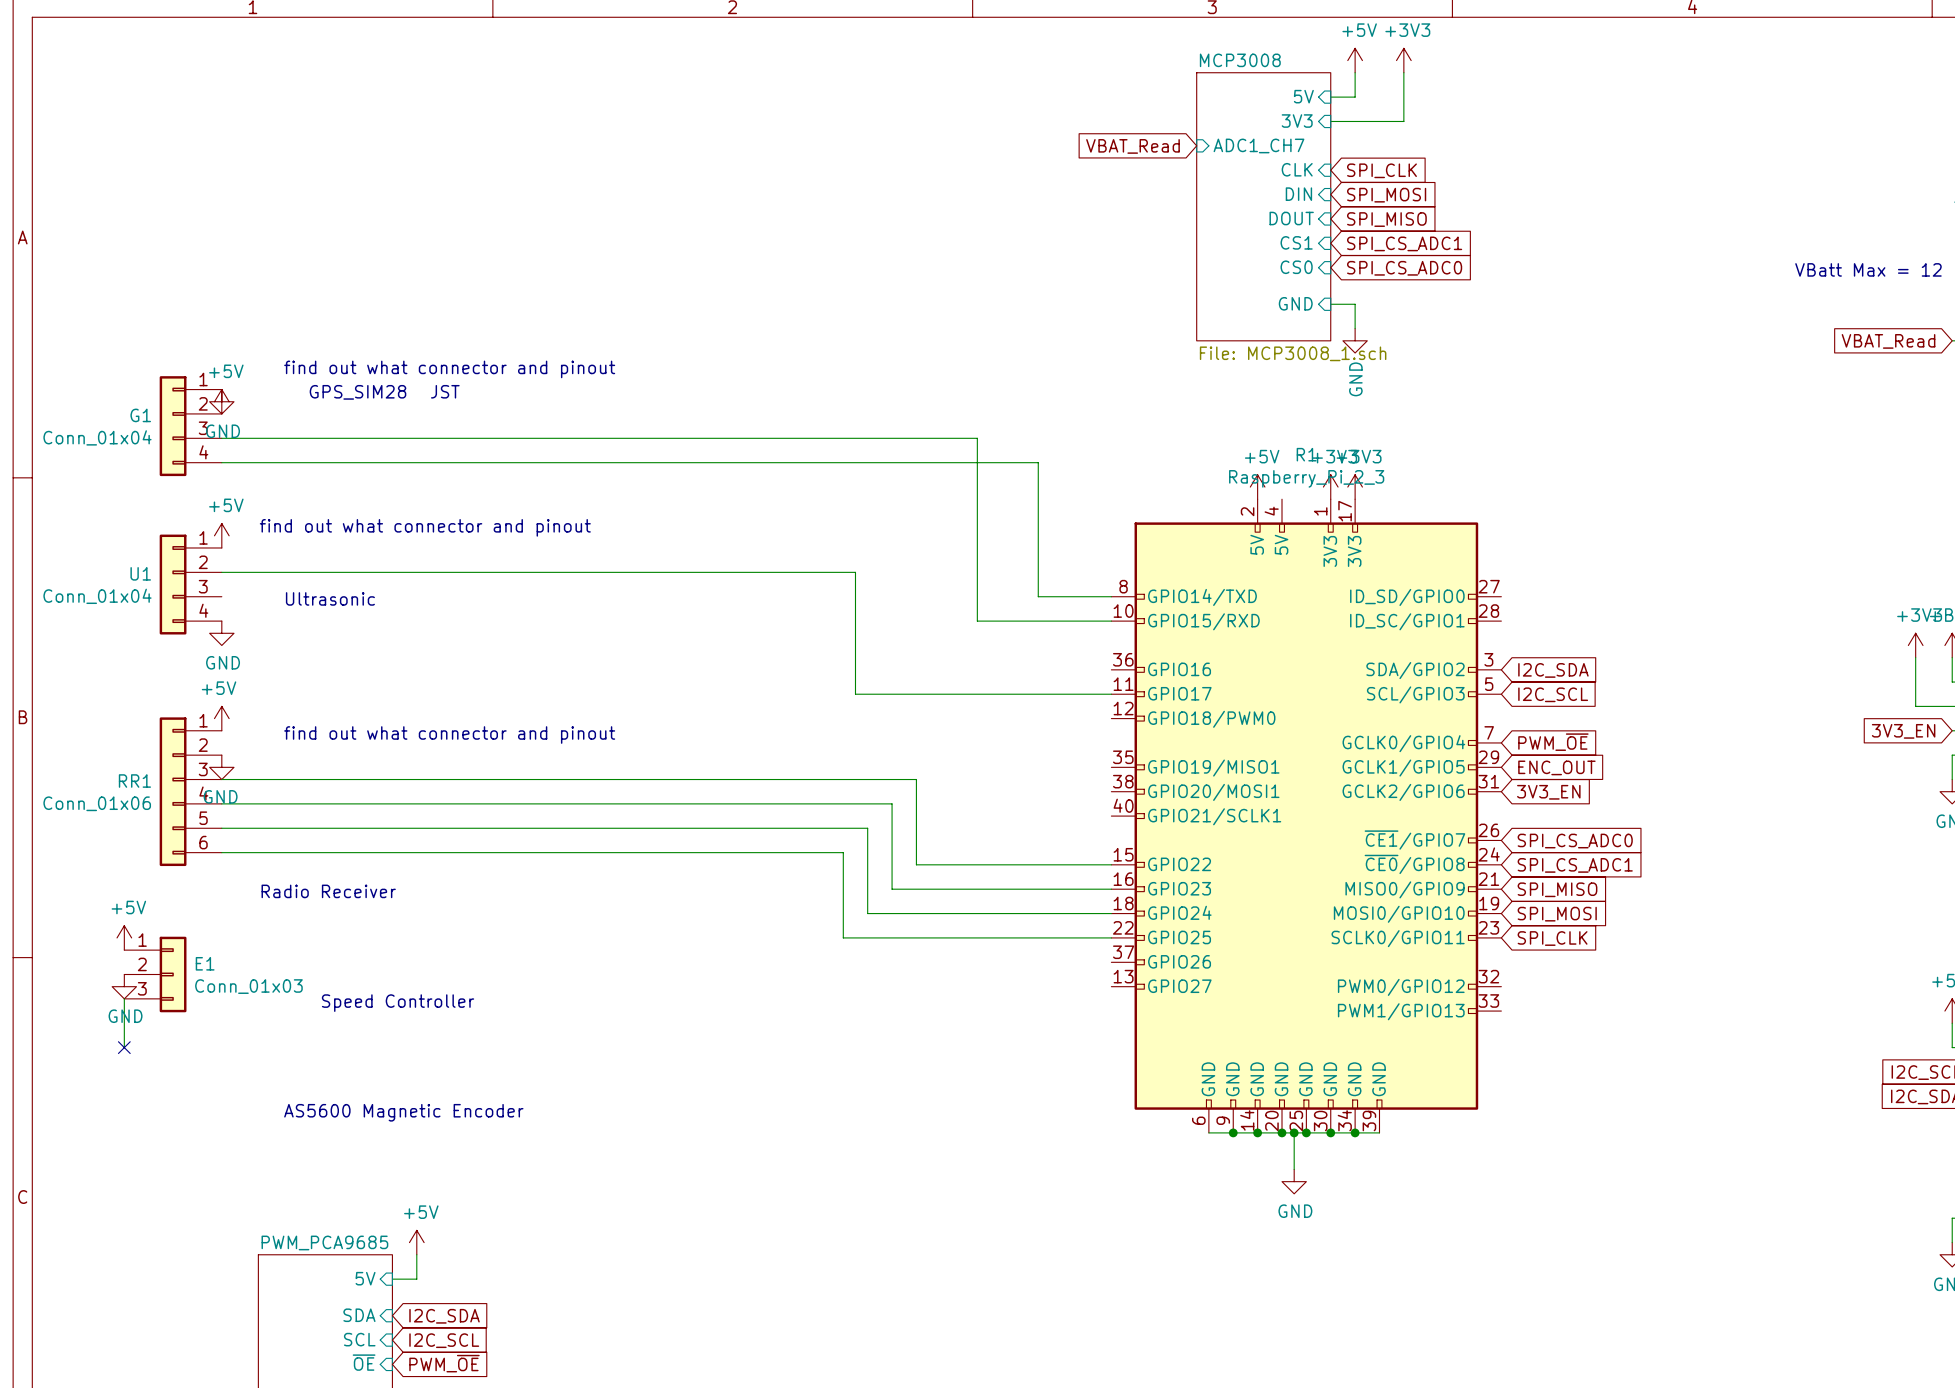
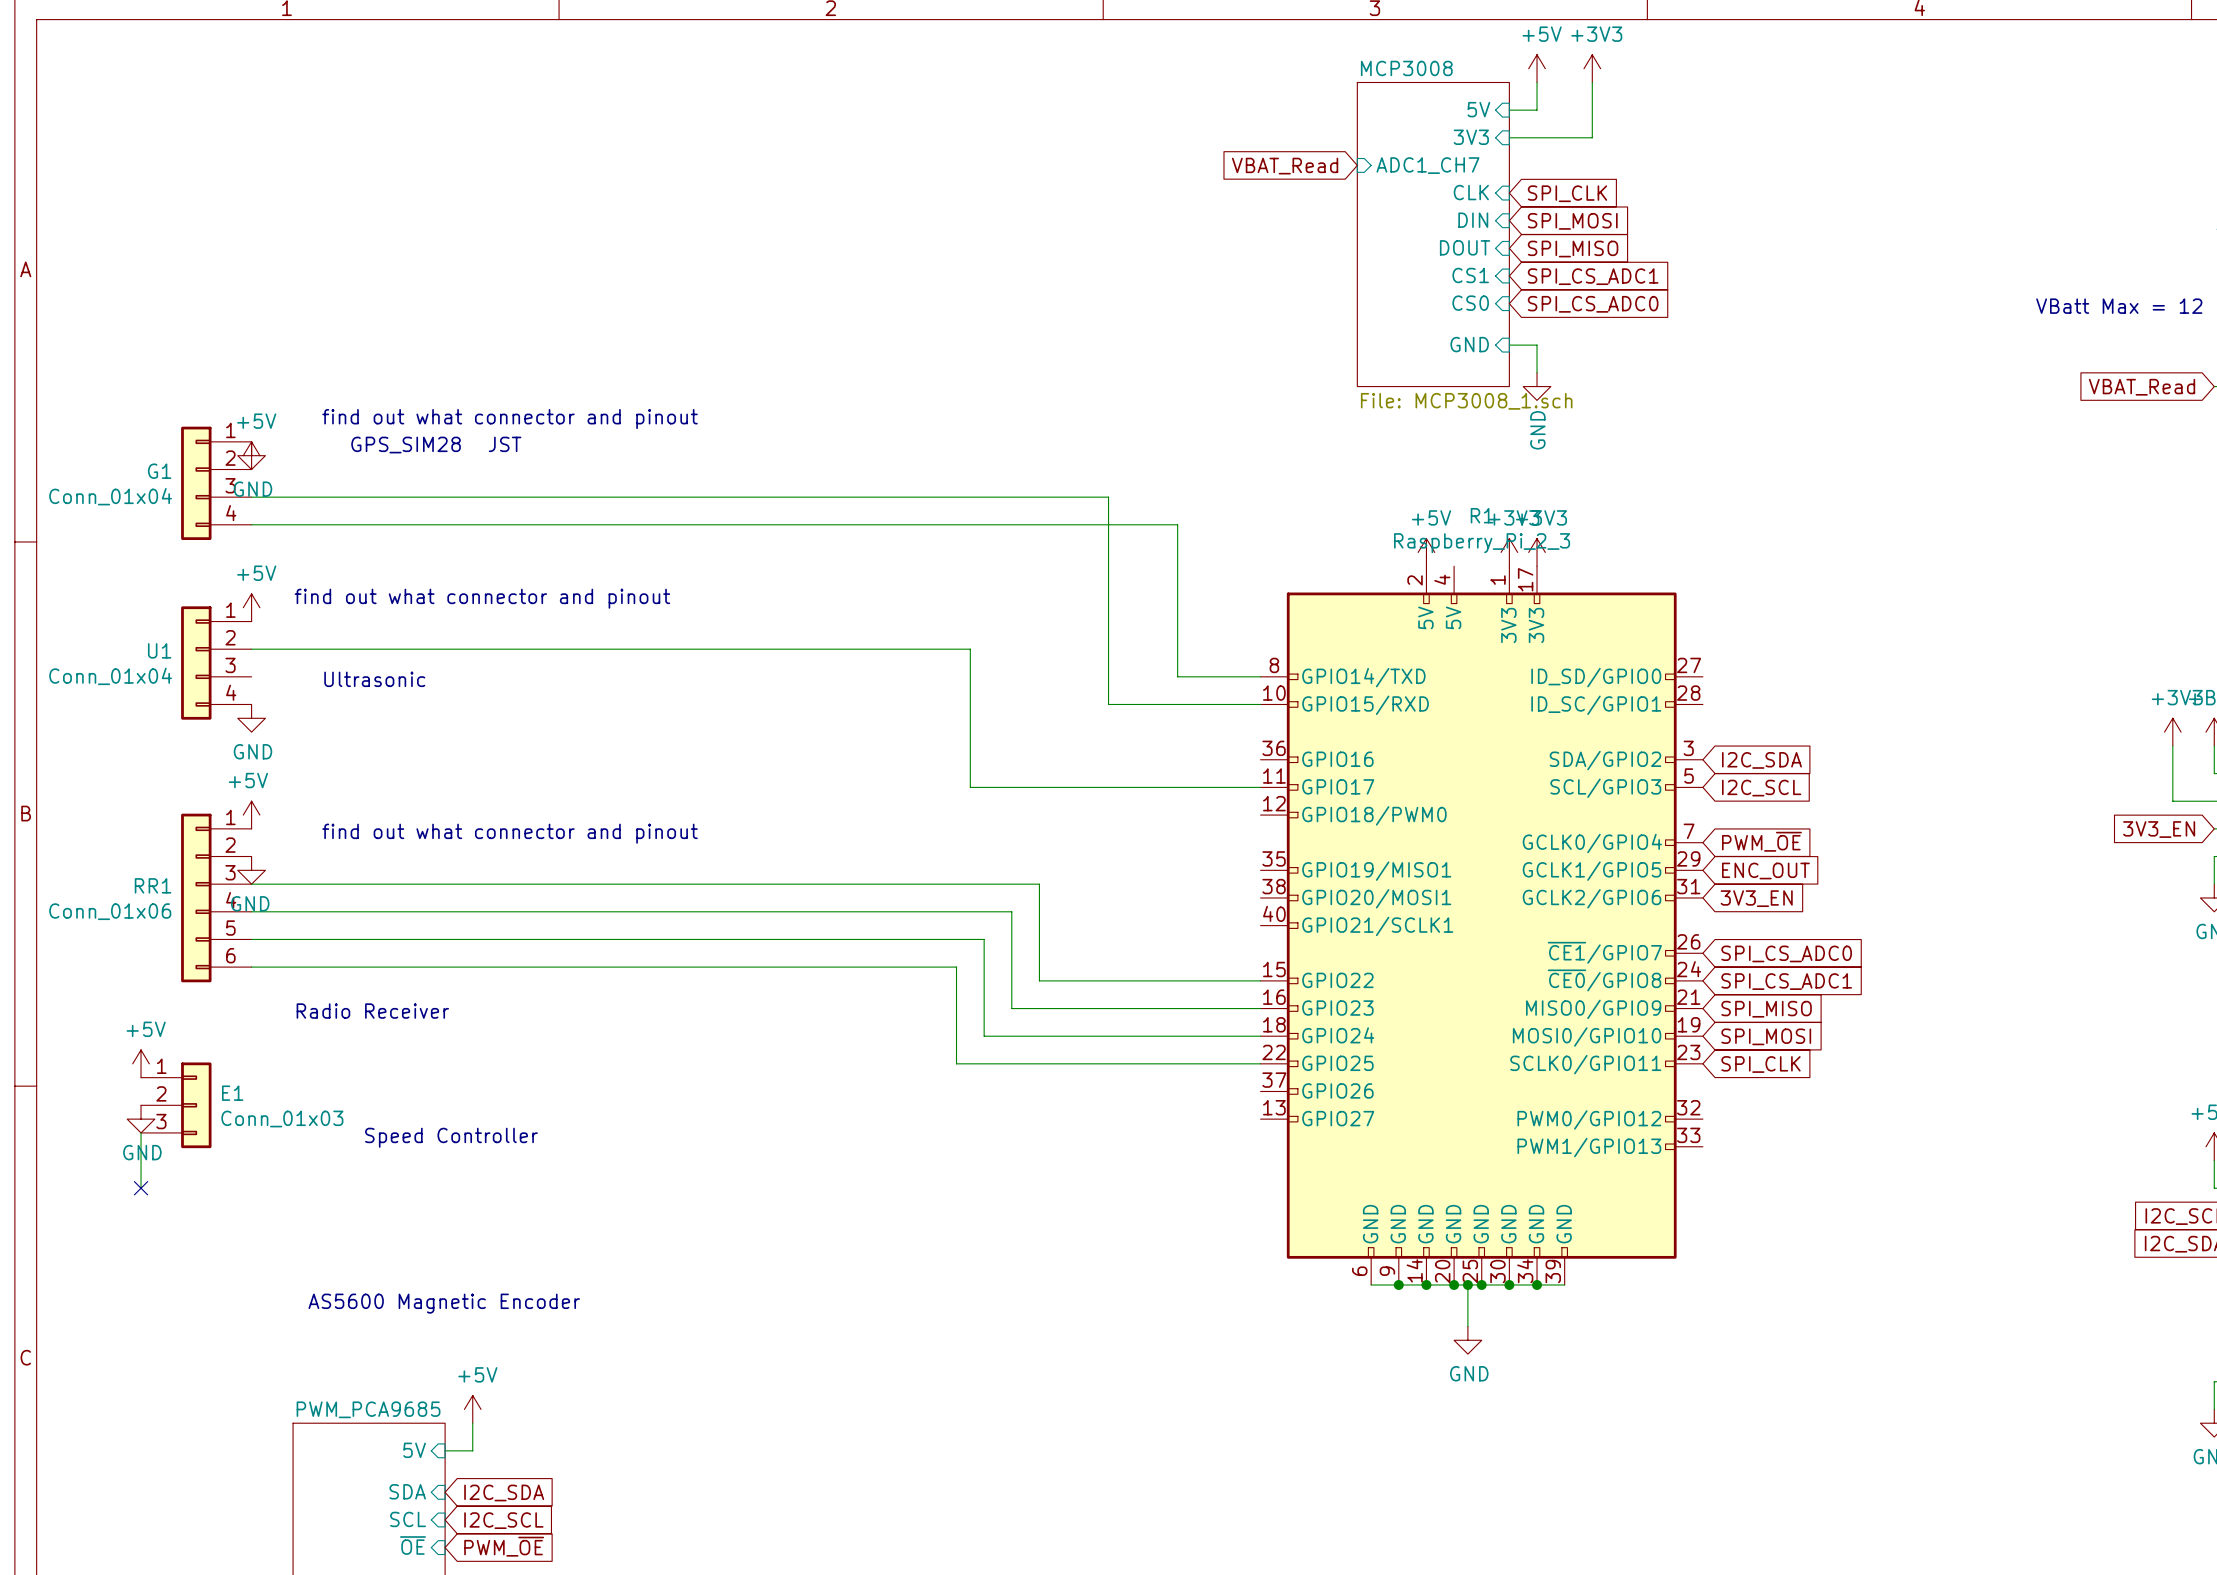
text position: AS5600 Magnetic Encoder (403, 1112) -> AS5600 Magnetic Encoder (444, 1303)

